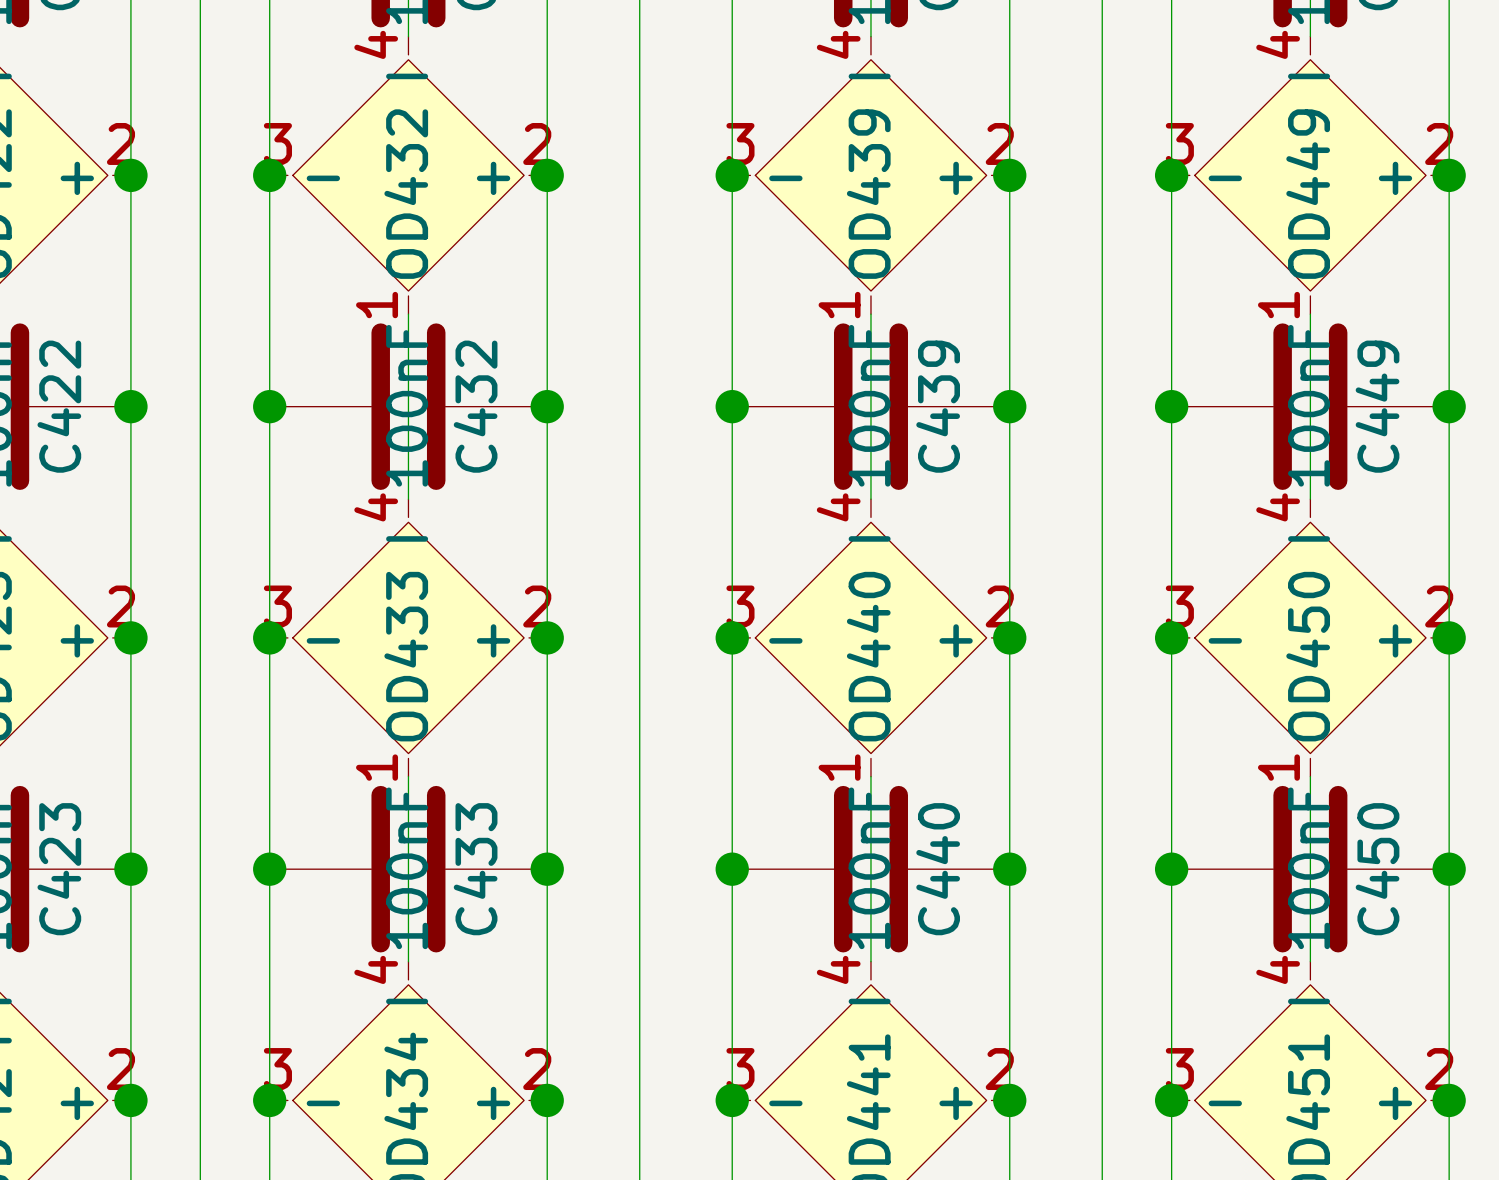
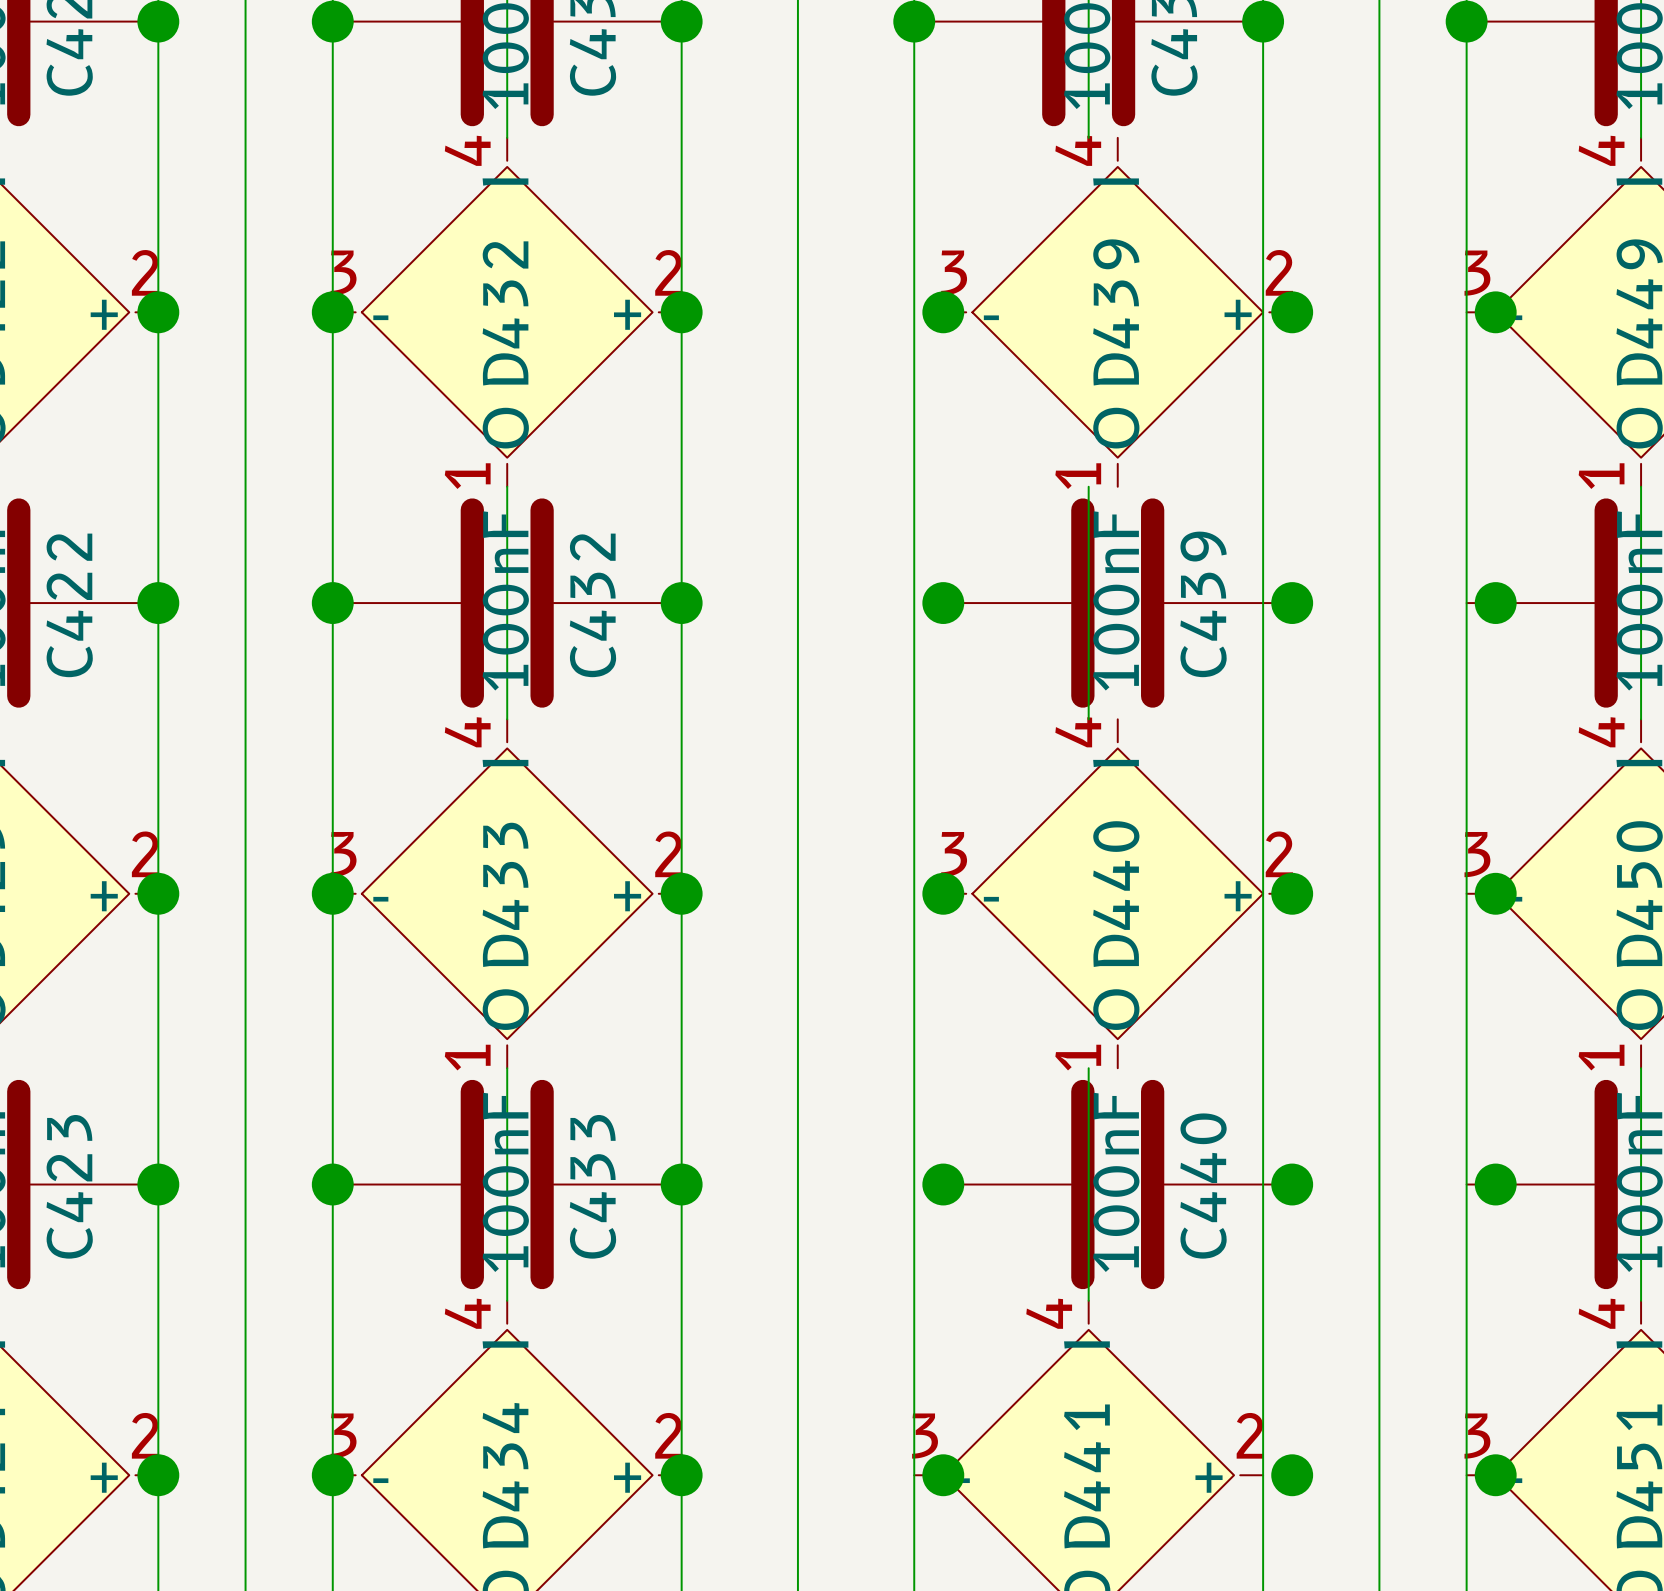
junction position: (732, 175) -> (943, 312)
D439 position: (870, 175) -> (1117, 312)
junction position: (1009, 175) -> (1292, 312)
junction position: (1171, 175) -> (1495, 312)
junction position: (732, 406) -> (943, 603)
C439 position: (870, 406) -> (1117, 603)
junction position: (1009, 406) -> (1292, 603)
junction position: (1171, 406) -> (1495, 603)
junction position: (732, 637) -> (943, 893)
D440 position: (870, 637) -> (1117, 893)
junction position: (1009, 637) -> (1292, 893)
junction position: (1171, 637) -> (1495, 893)
junction position: (732, 869) -> (943, 1184)
C440 position: (870, 869) -> (1117, 1184)
junction position: (1009, 869) -> (1292, 1184)
junction position: (1171, 869) -> (1495, 1184)
junction position: (732, 1100) -> (943, 1475)
junction position: (1009, 1100) -> (1292, 1475)
junction position: (1171, 1100) -> (1495, 1475)

